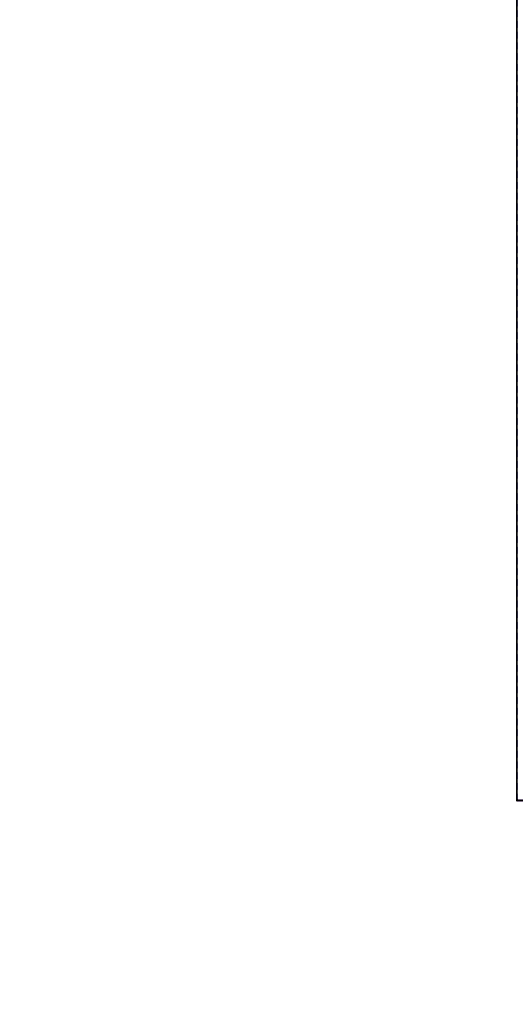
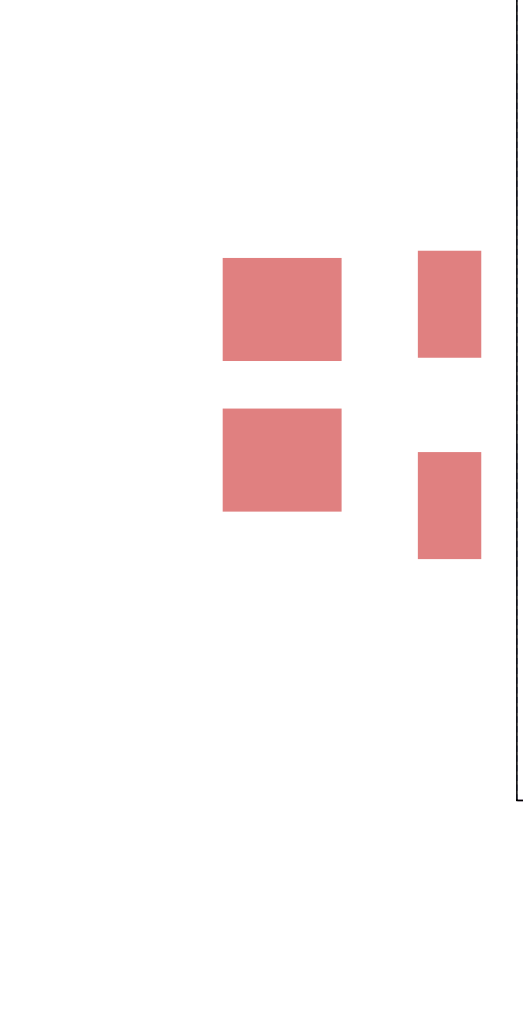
part: none -> (282, 384)
part: none -> (449, 404)

